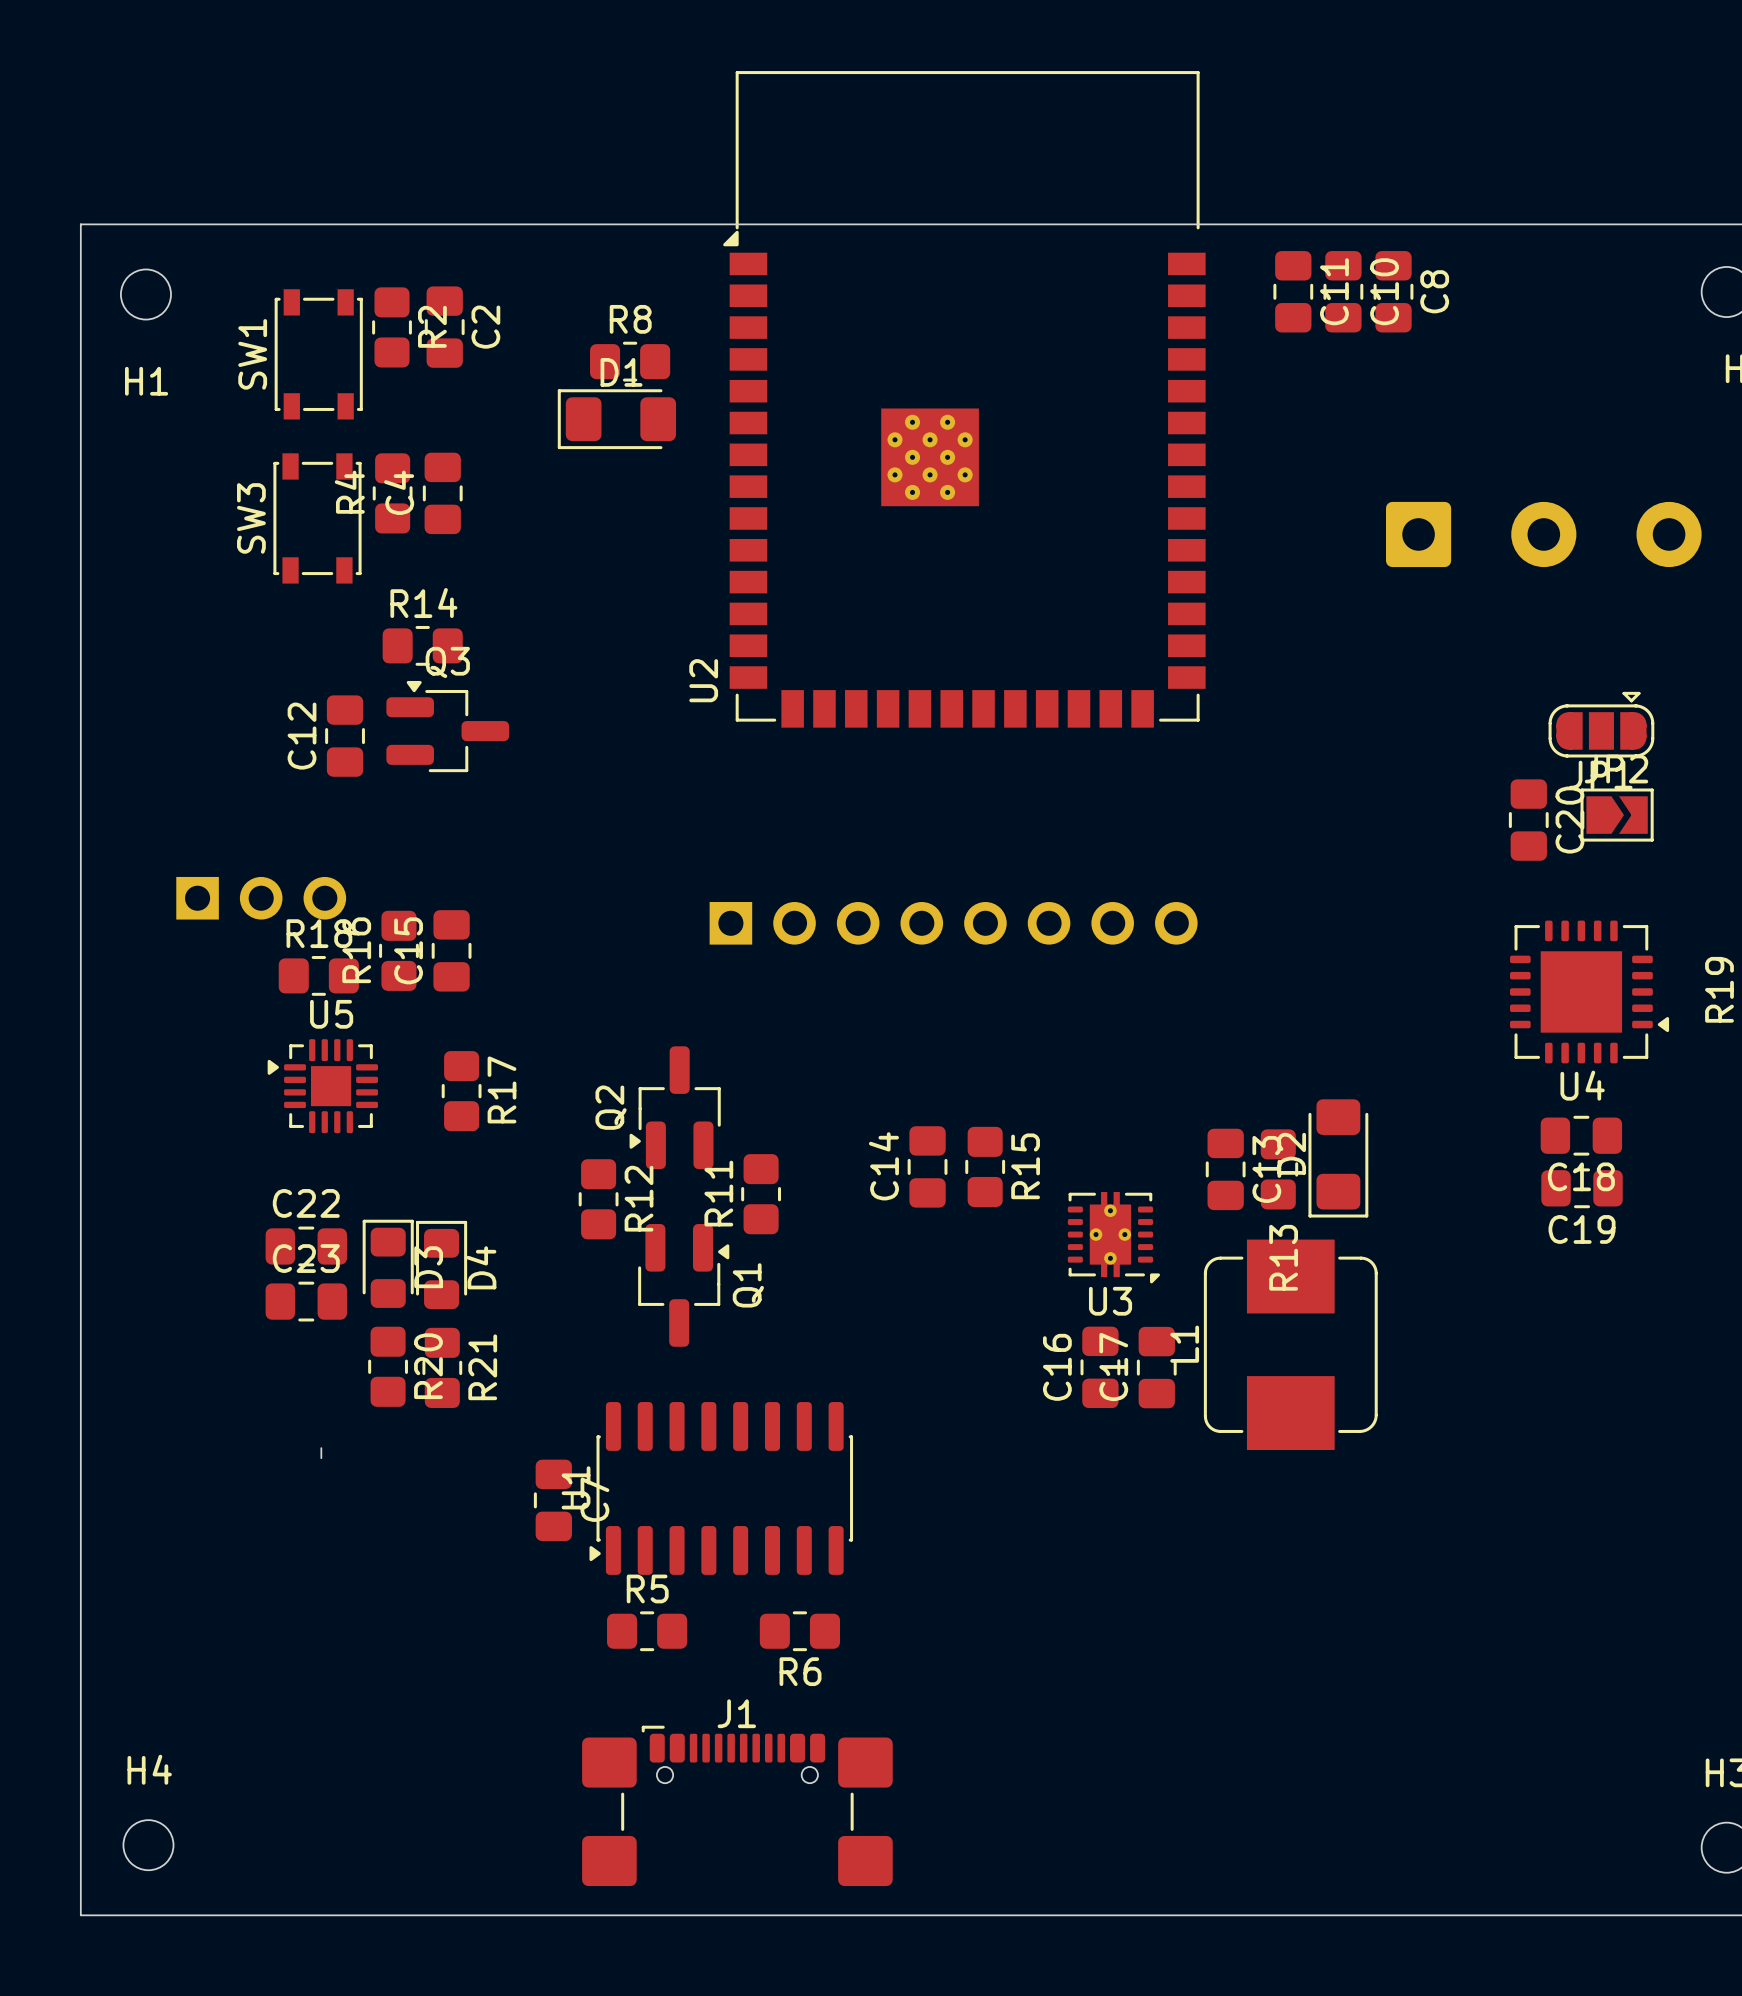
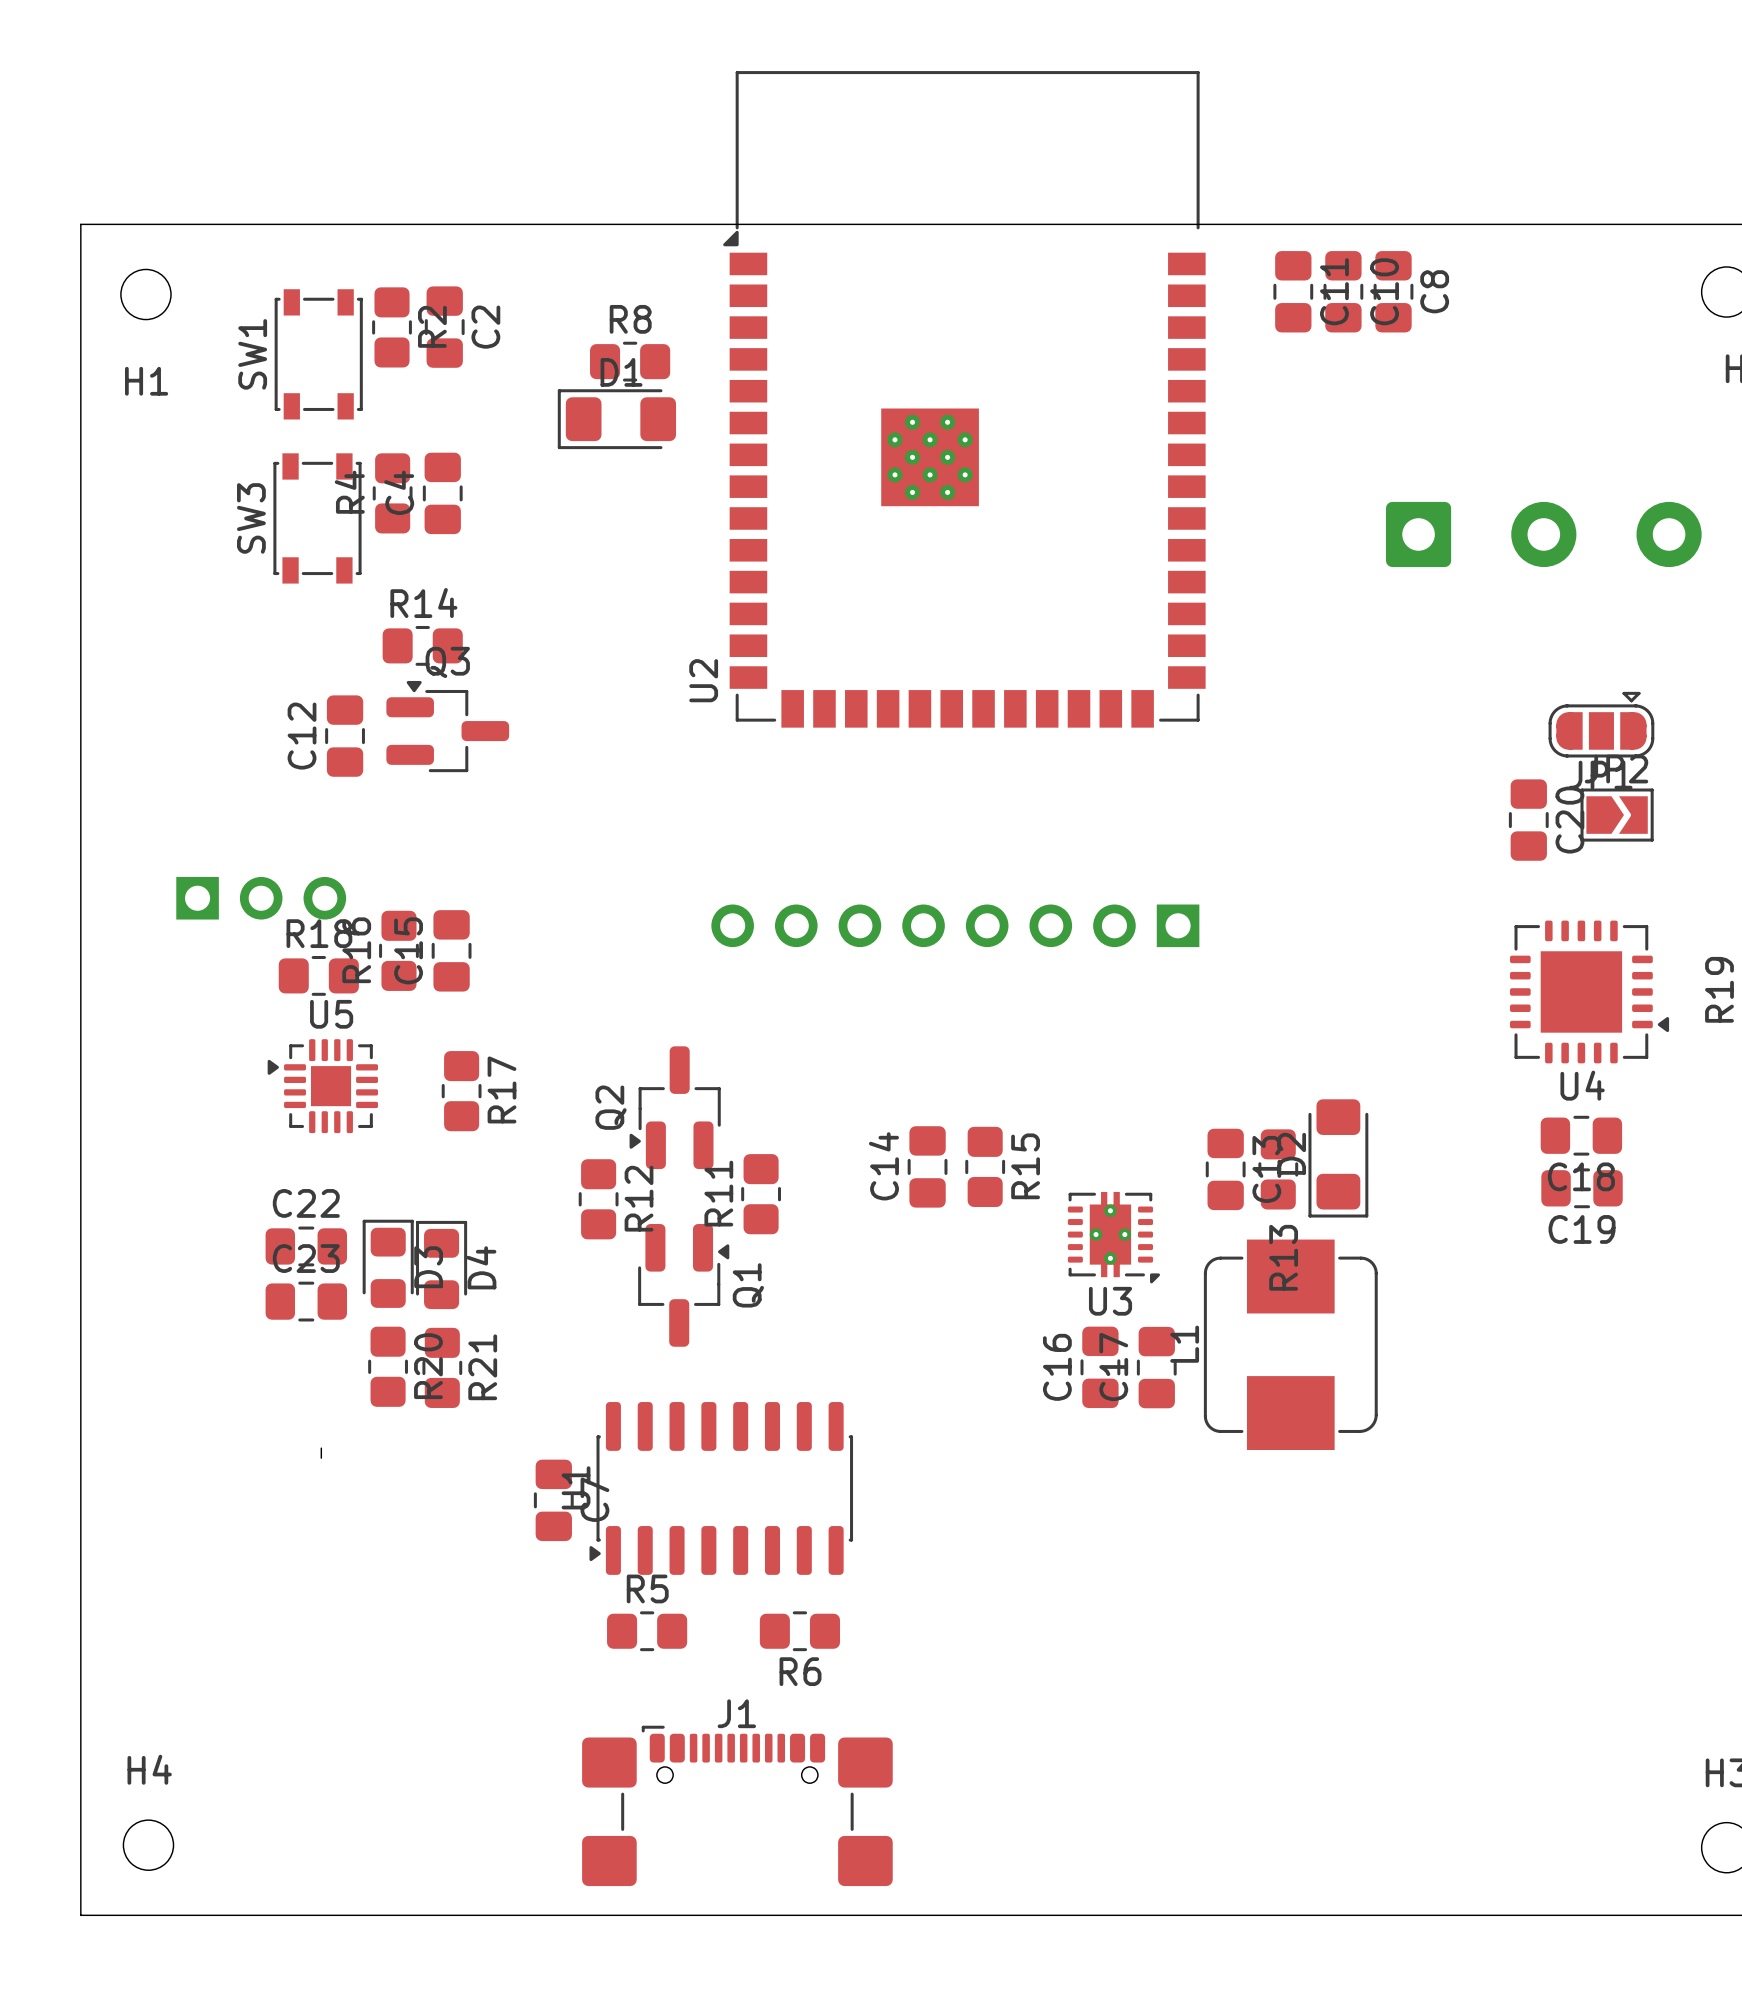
part rotation: 0° (953, 923) -> 180° (955, 925)

